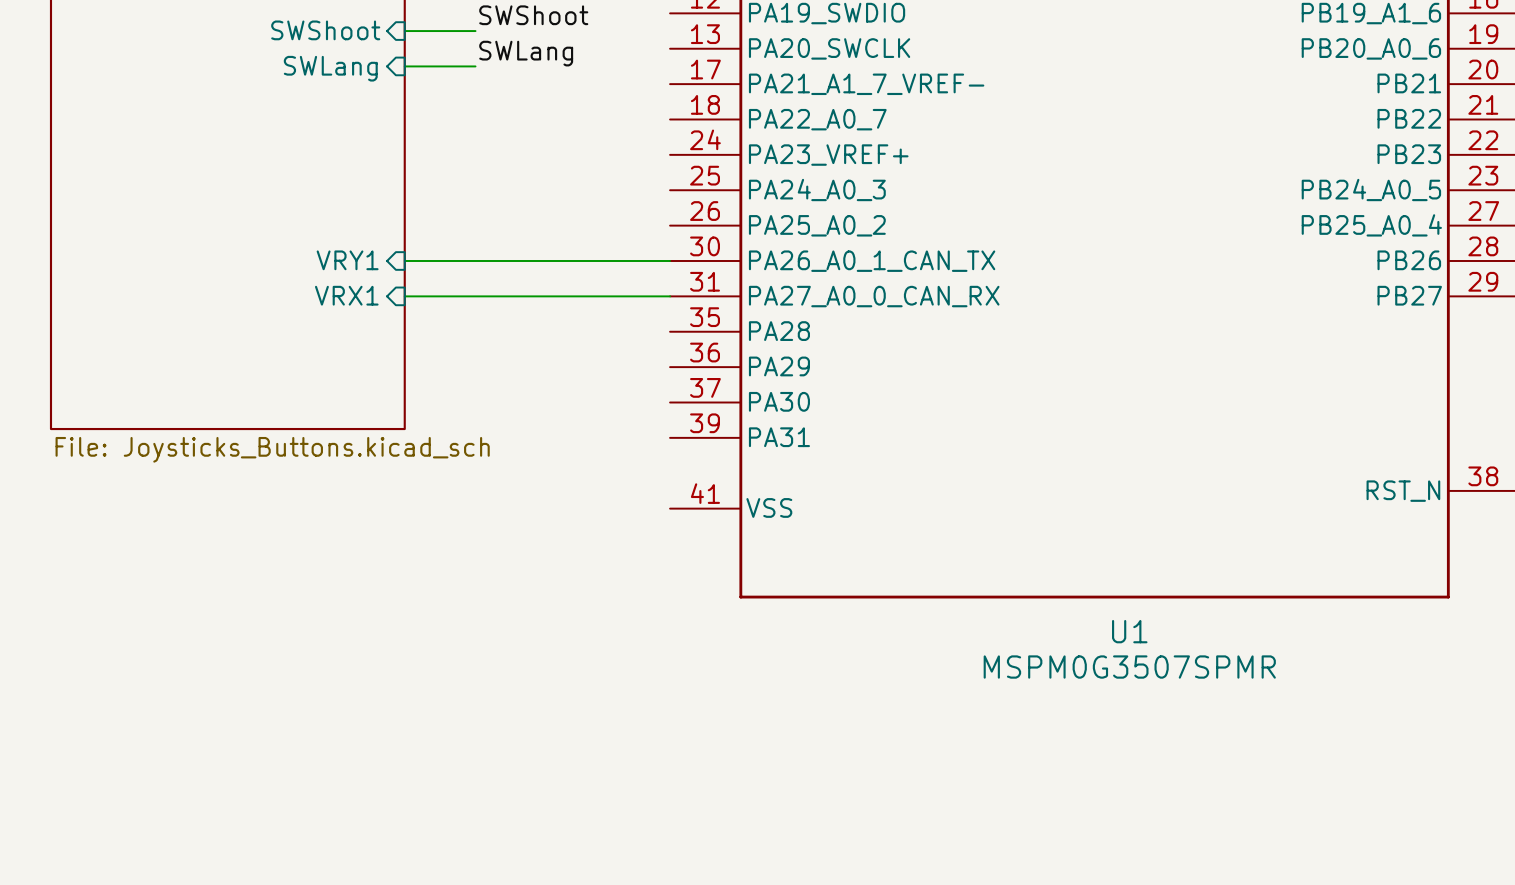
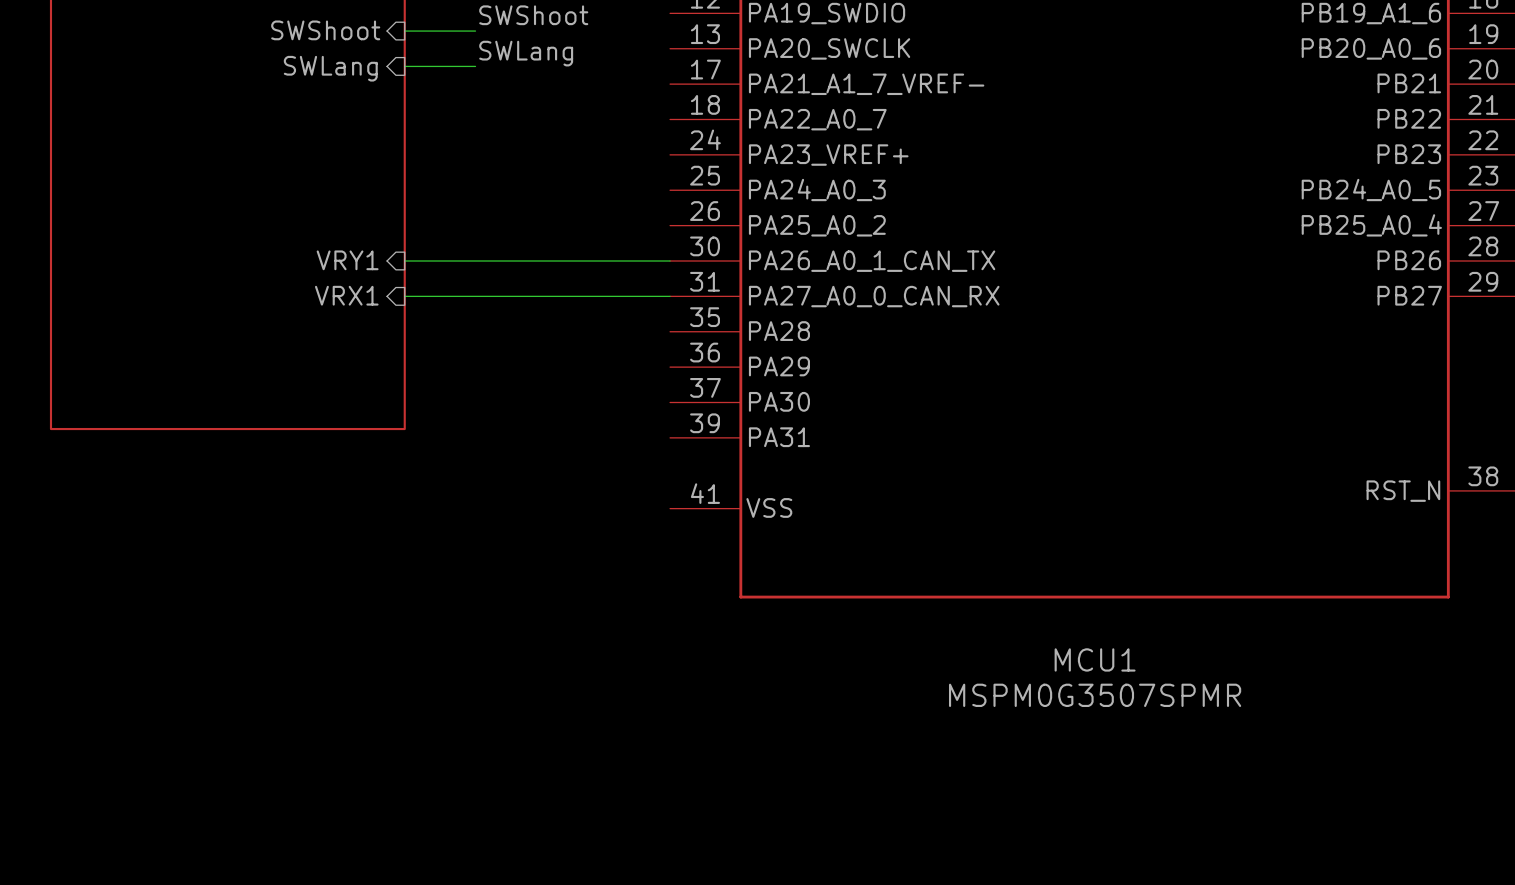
sheet value: File: Joysticks_Buttons.kicad_sch (272, 449) -> none
U1 name: U1 (1129, 631) -> MCU1 (1095, 659)
U1 value position: MSPM0G3507SPMR (1129, 667) -> MSPM0G3507SPMR (1095, 695)

